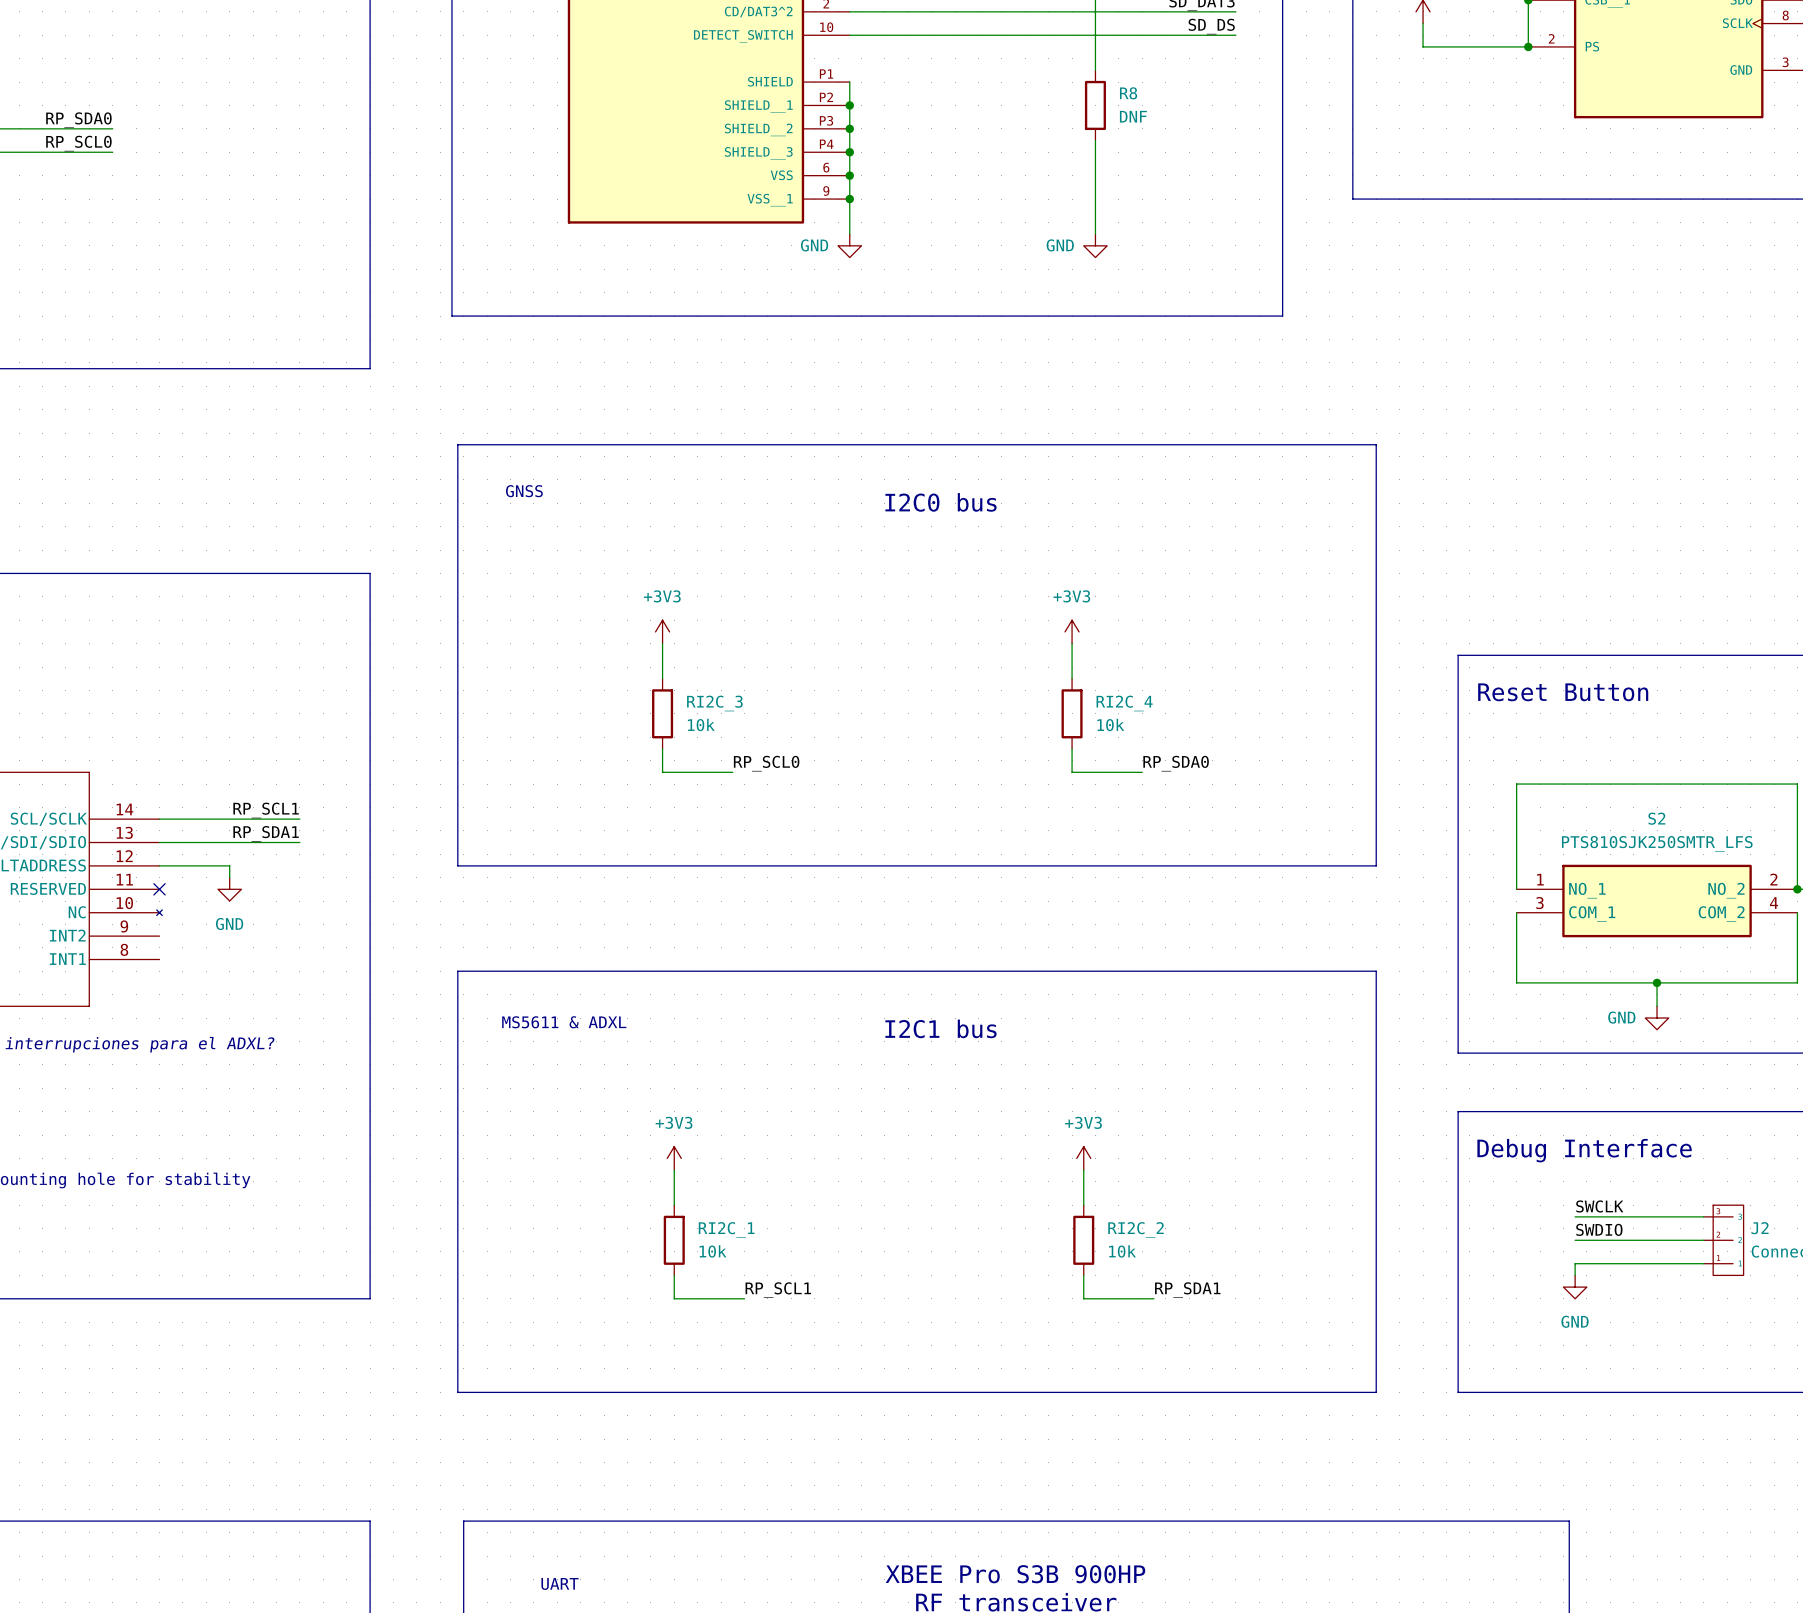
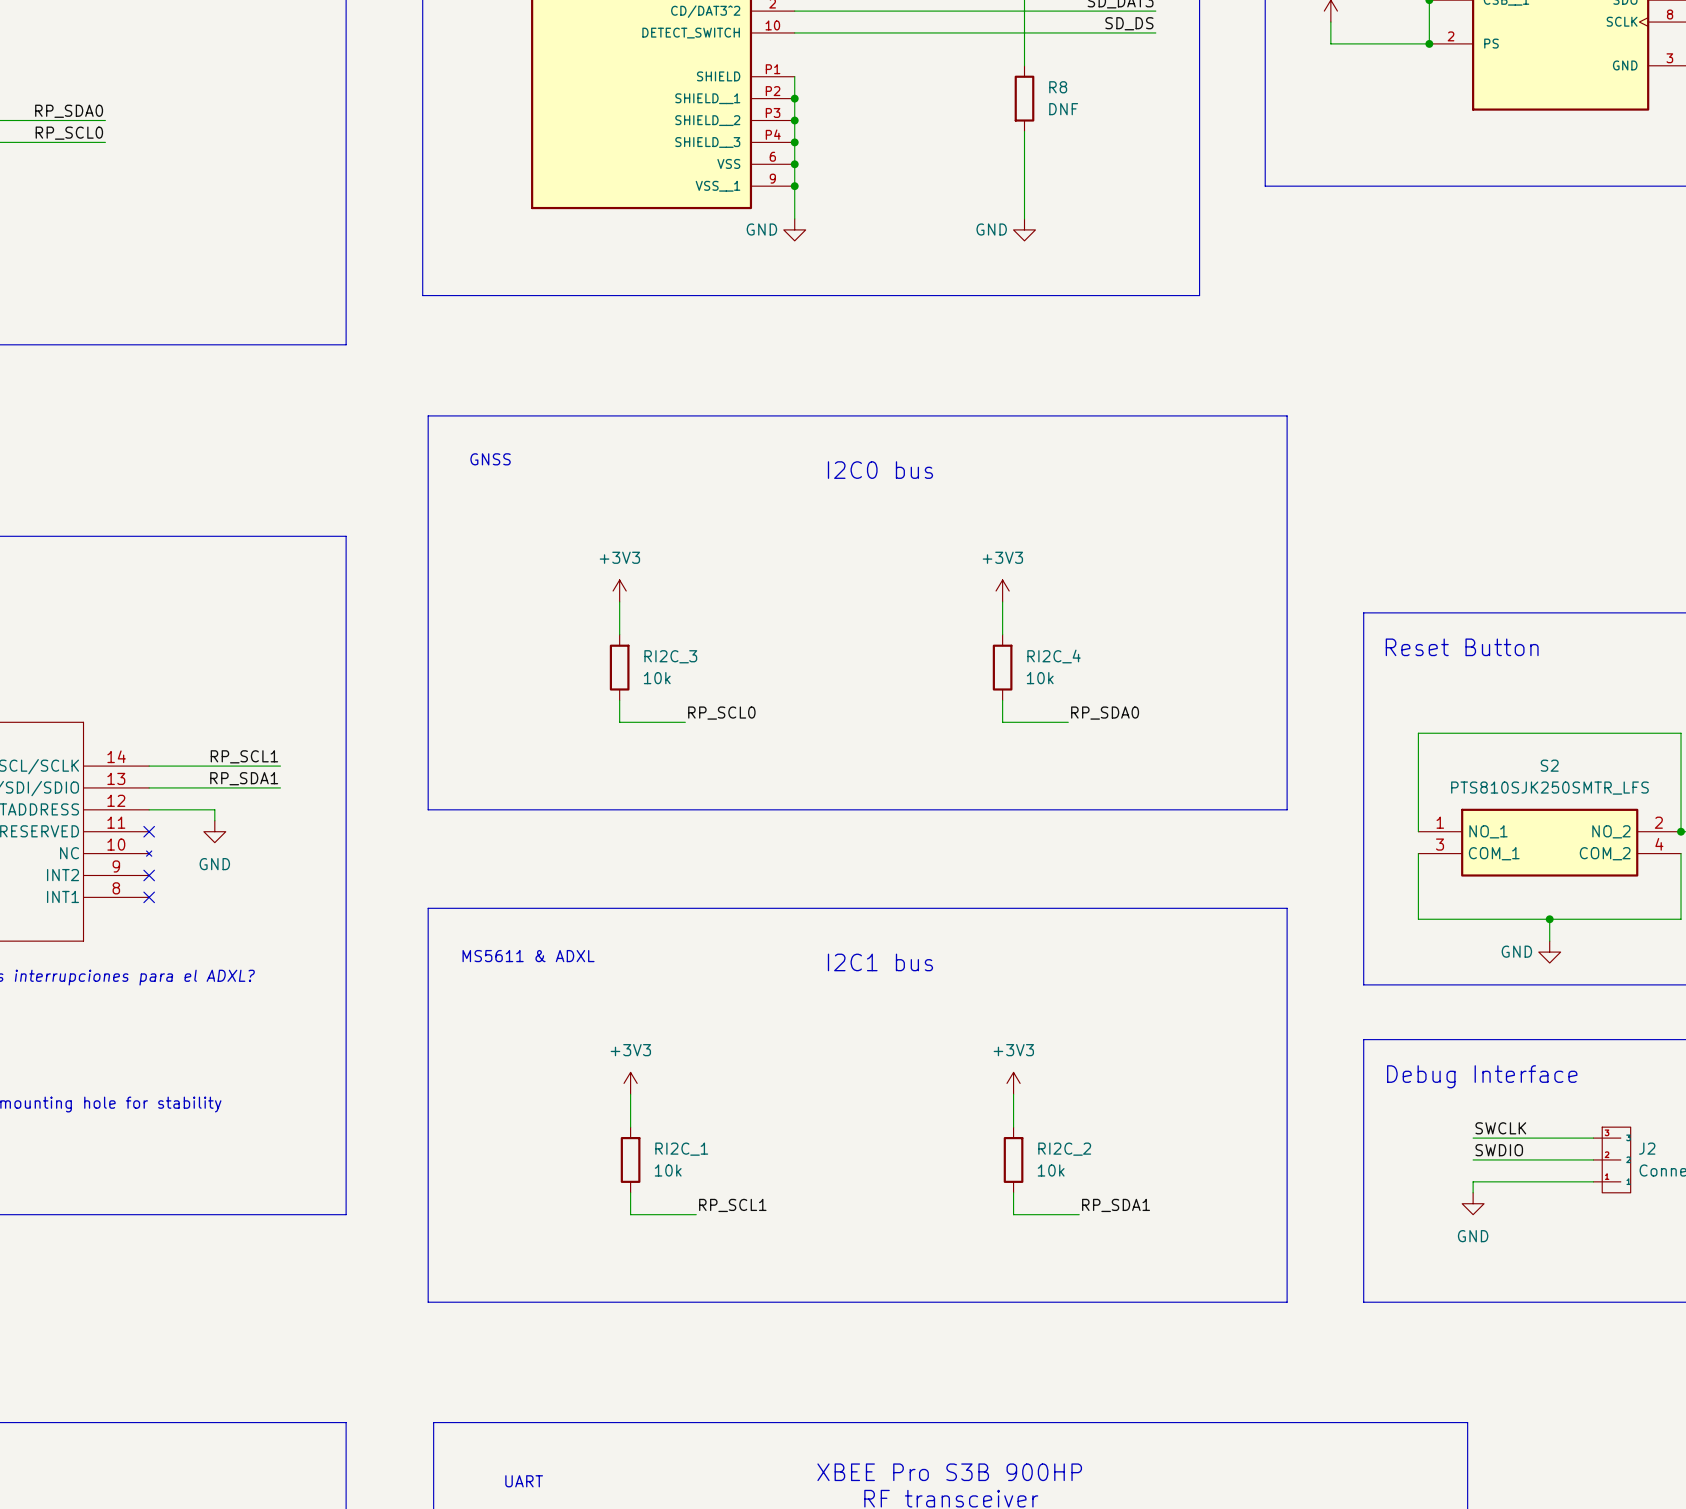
no-connect mark: none -> (149, 875)
no-connect mark: none -> (149, 897)

